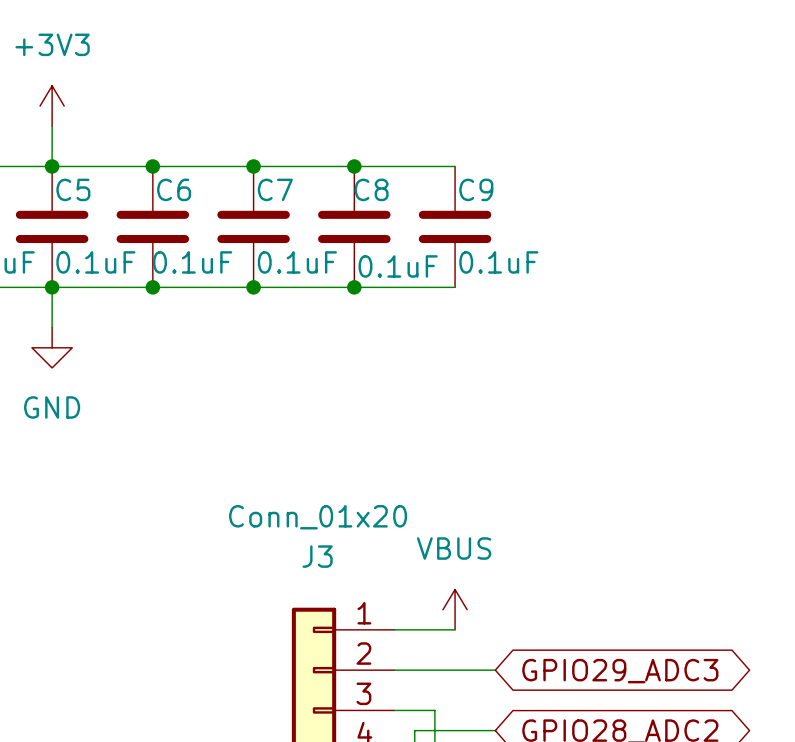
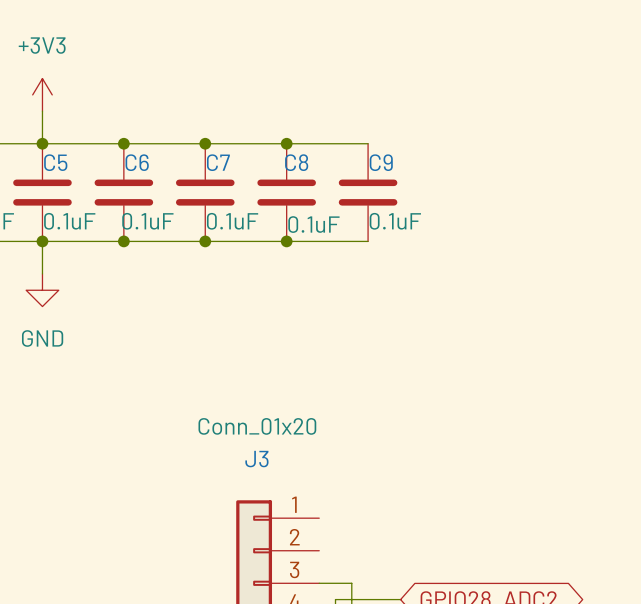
power symbol: VBUS (455, 609) -> none
wire: (394, 629) (455, 629) -> none
wire: (394, 670) (495, 670) -> none
global label: GPIO29_ADC3 (620, 671) -> none

